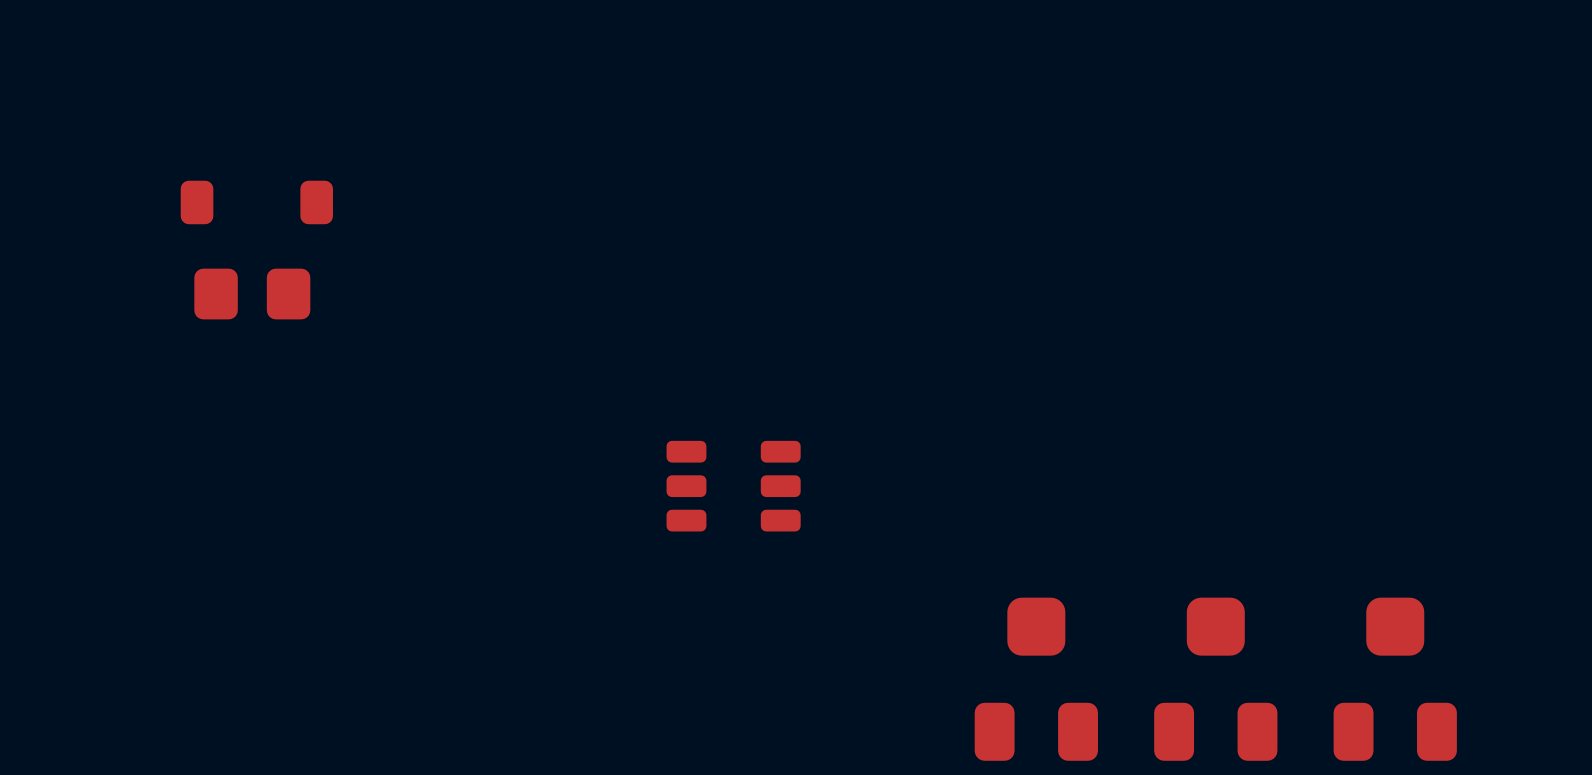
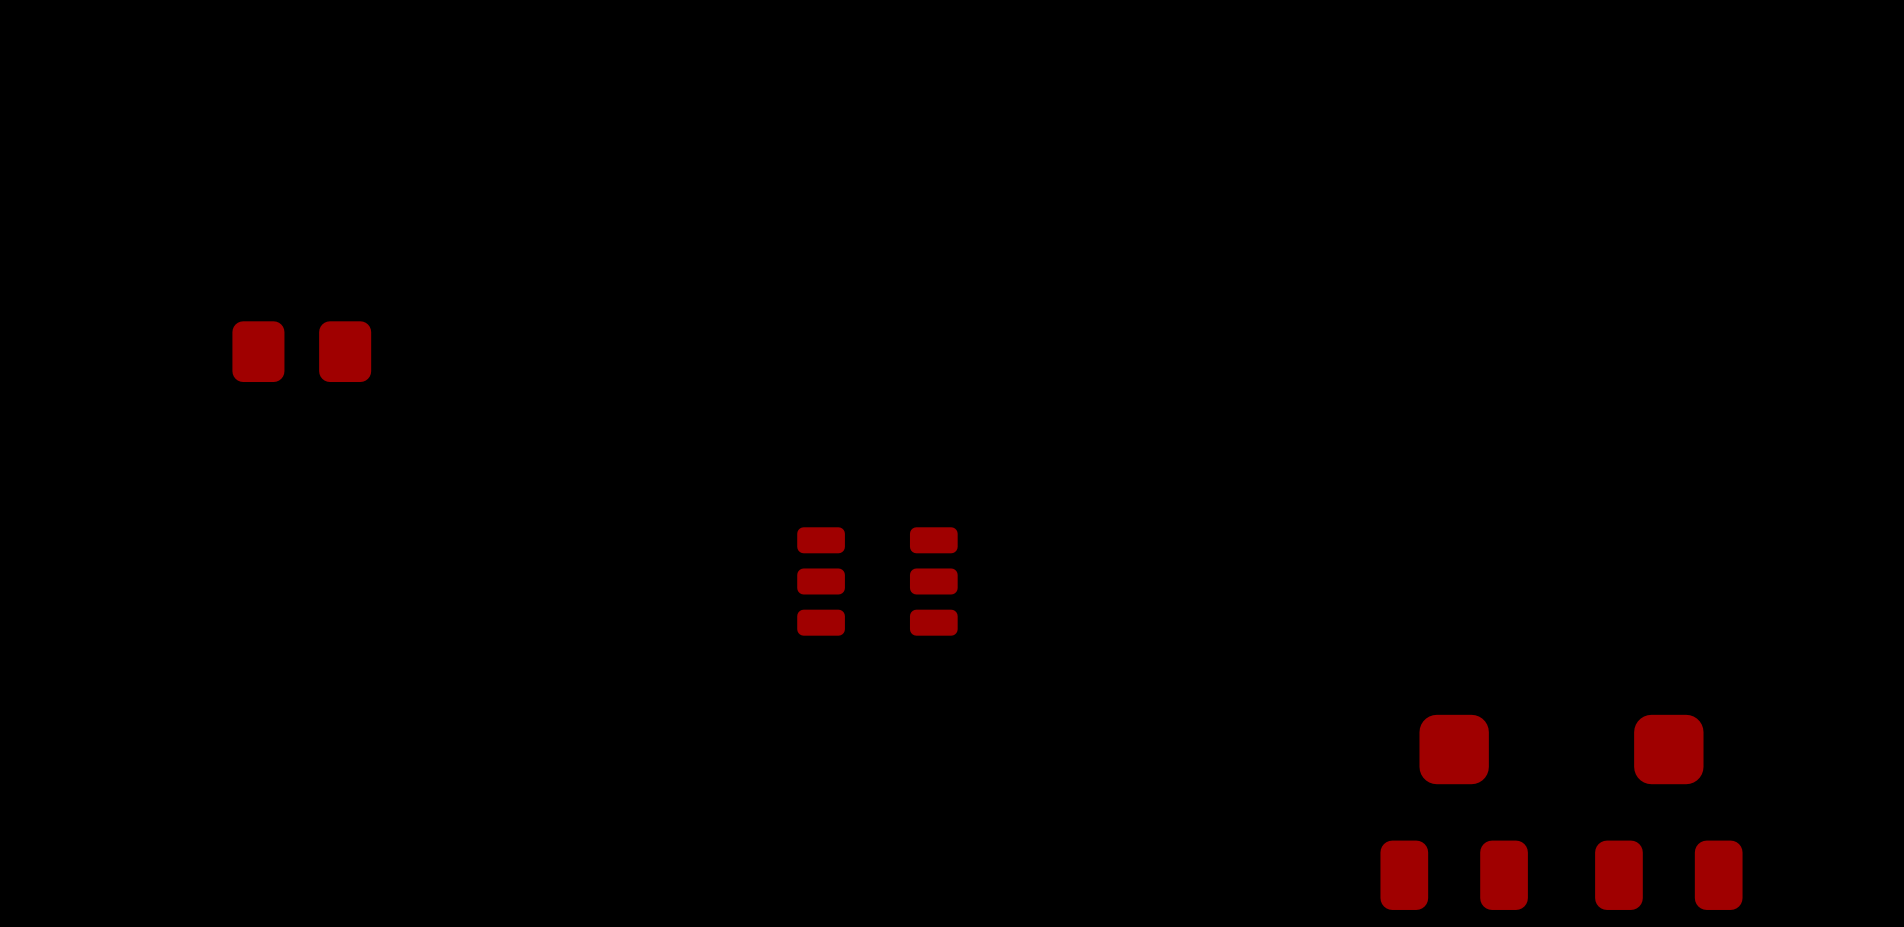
part: (256, 202) -> none
part: (1036, 679) -> none

